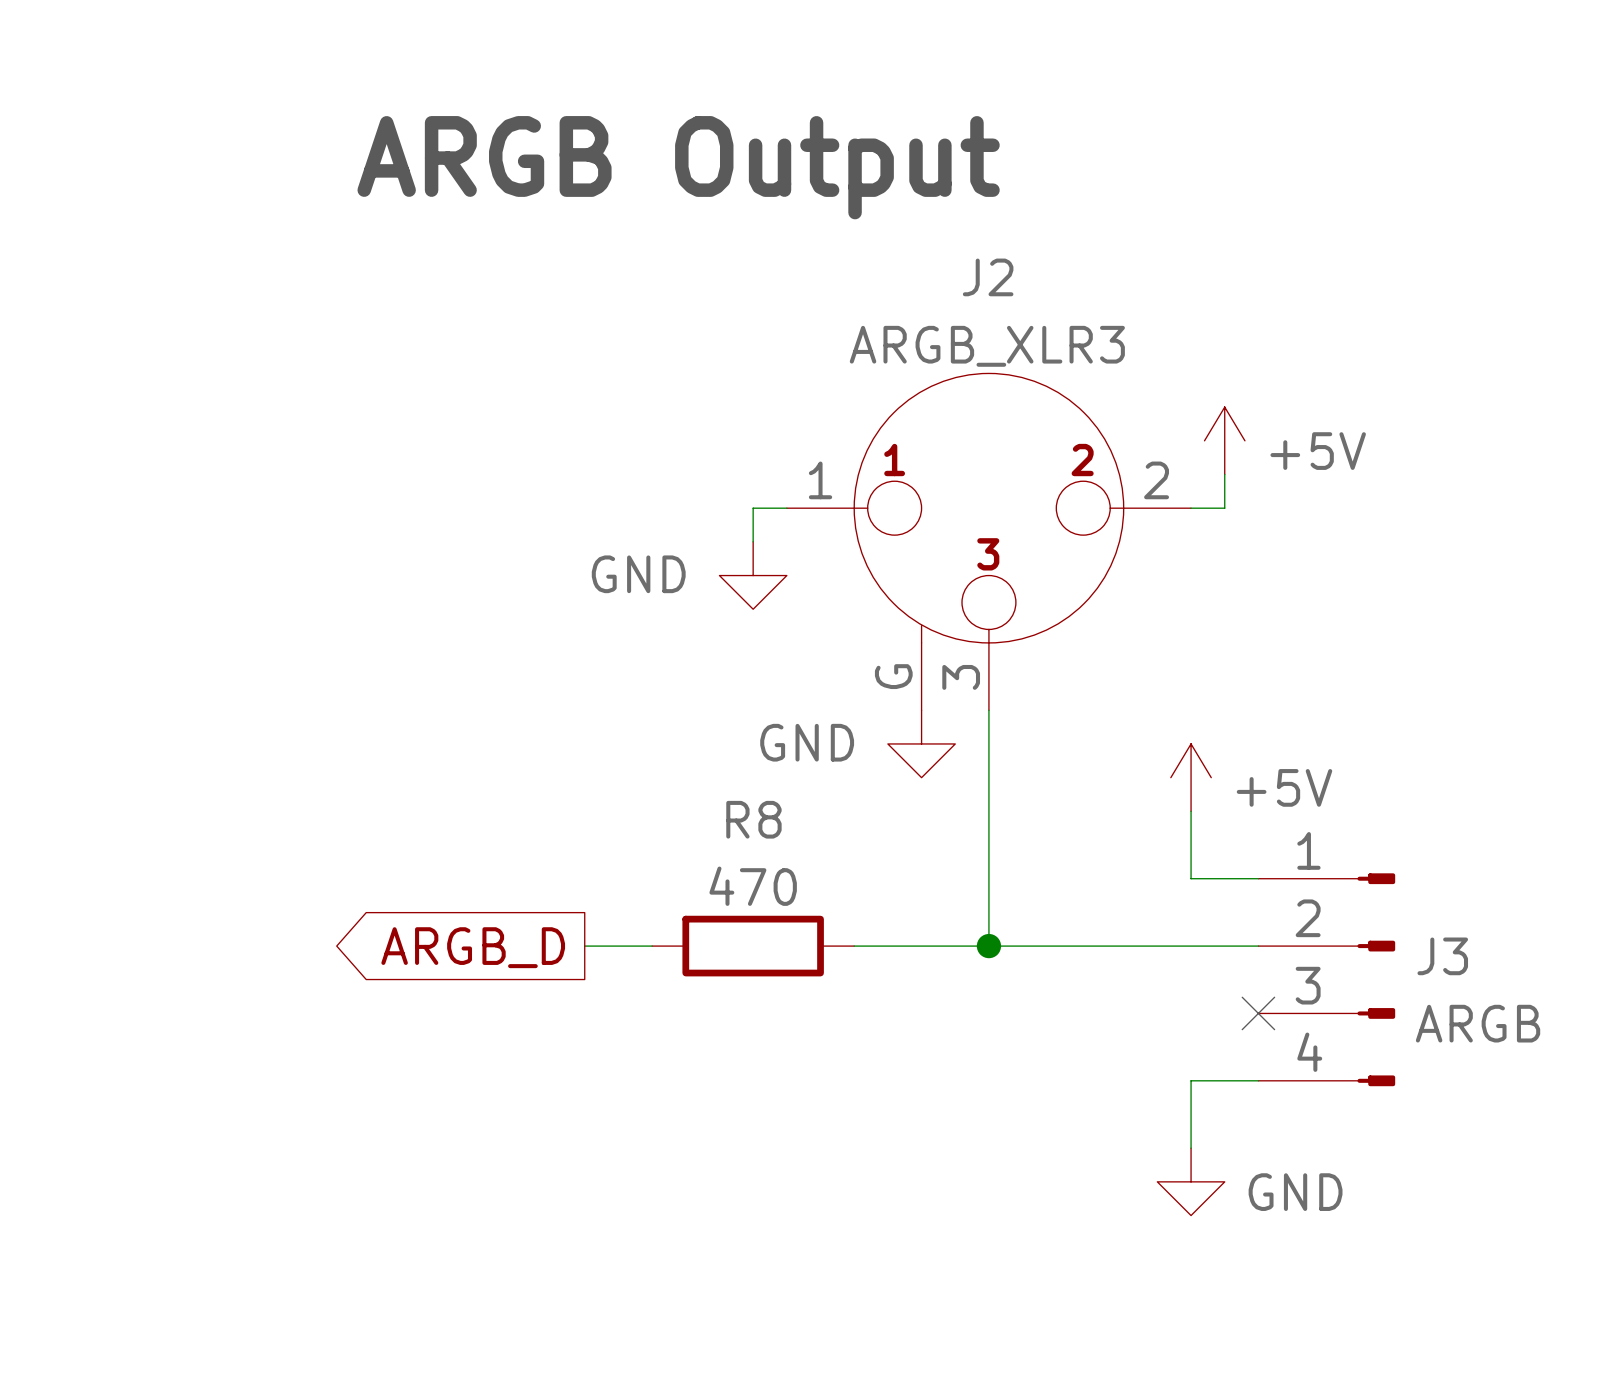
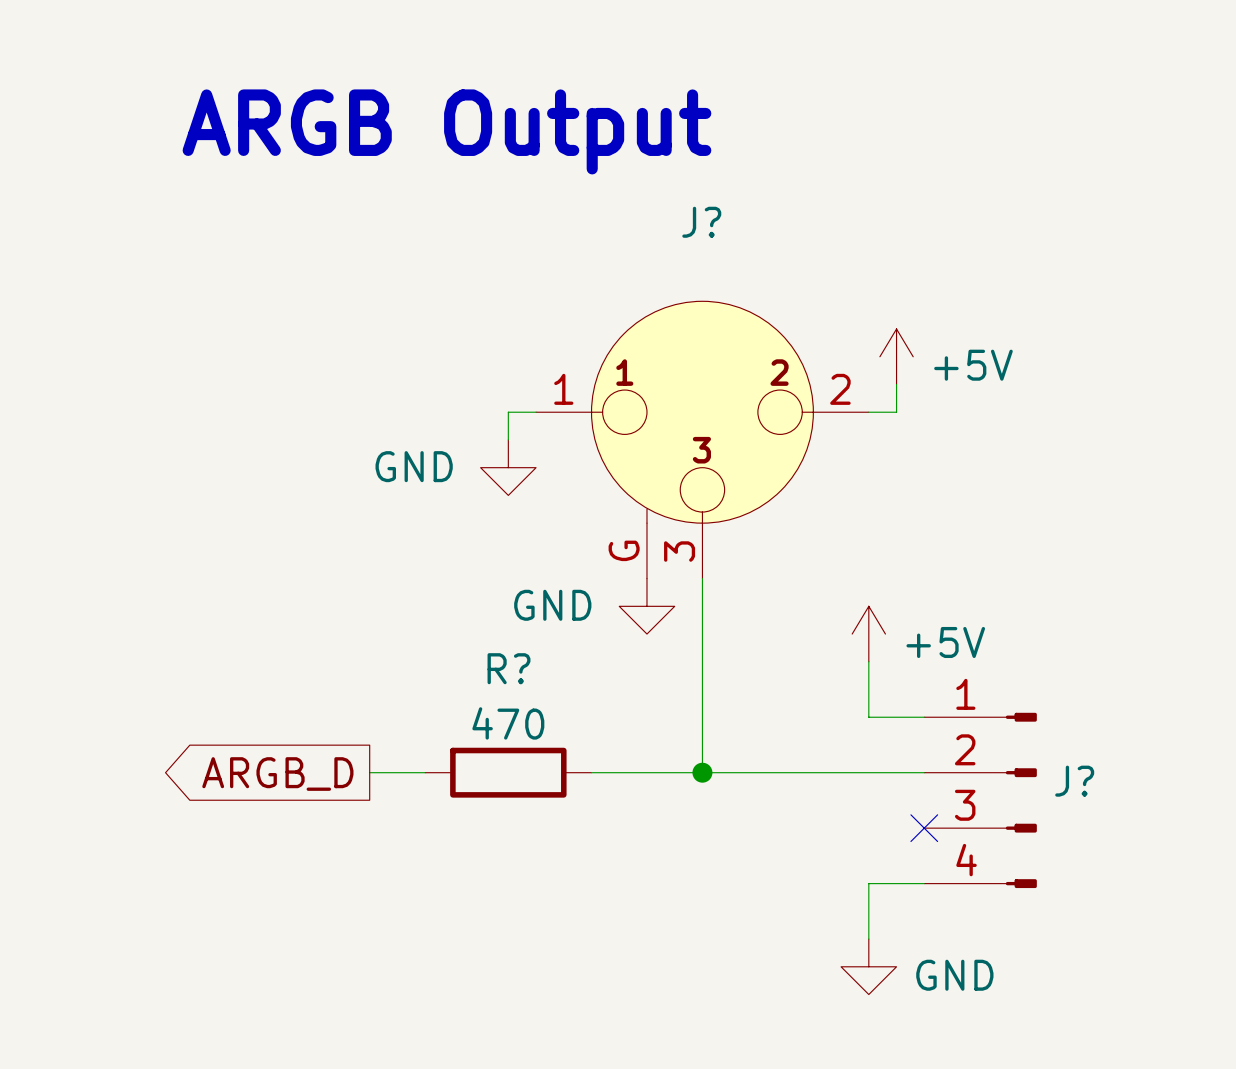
J2 name: J2 (988, 277) -> J? (701, 222)
J2 value: ARGB_XLR3 (987, 346) -> none
R8 name: R8 (753, 819) -> R? (509, 668)
J3 name: J3 (1442, 956) -> J? (1074, 781)
J3 value: ARGB (1478, 1023) -> none

